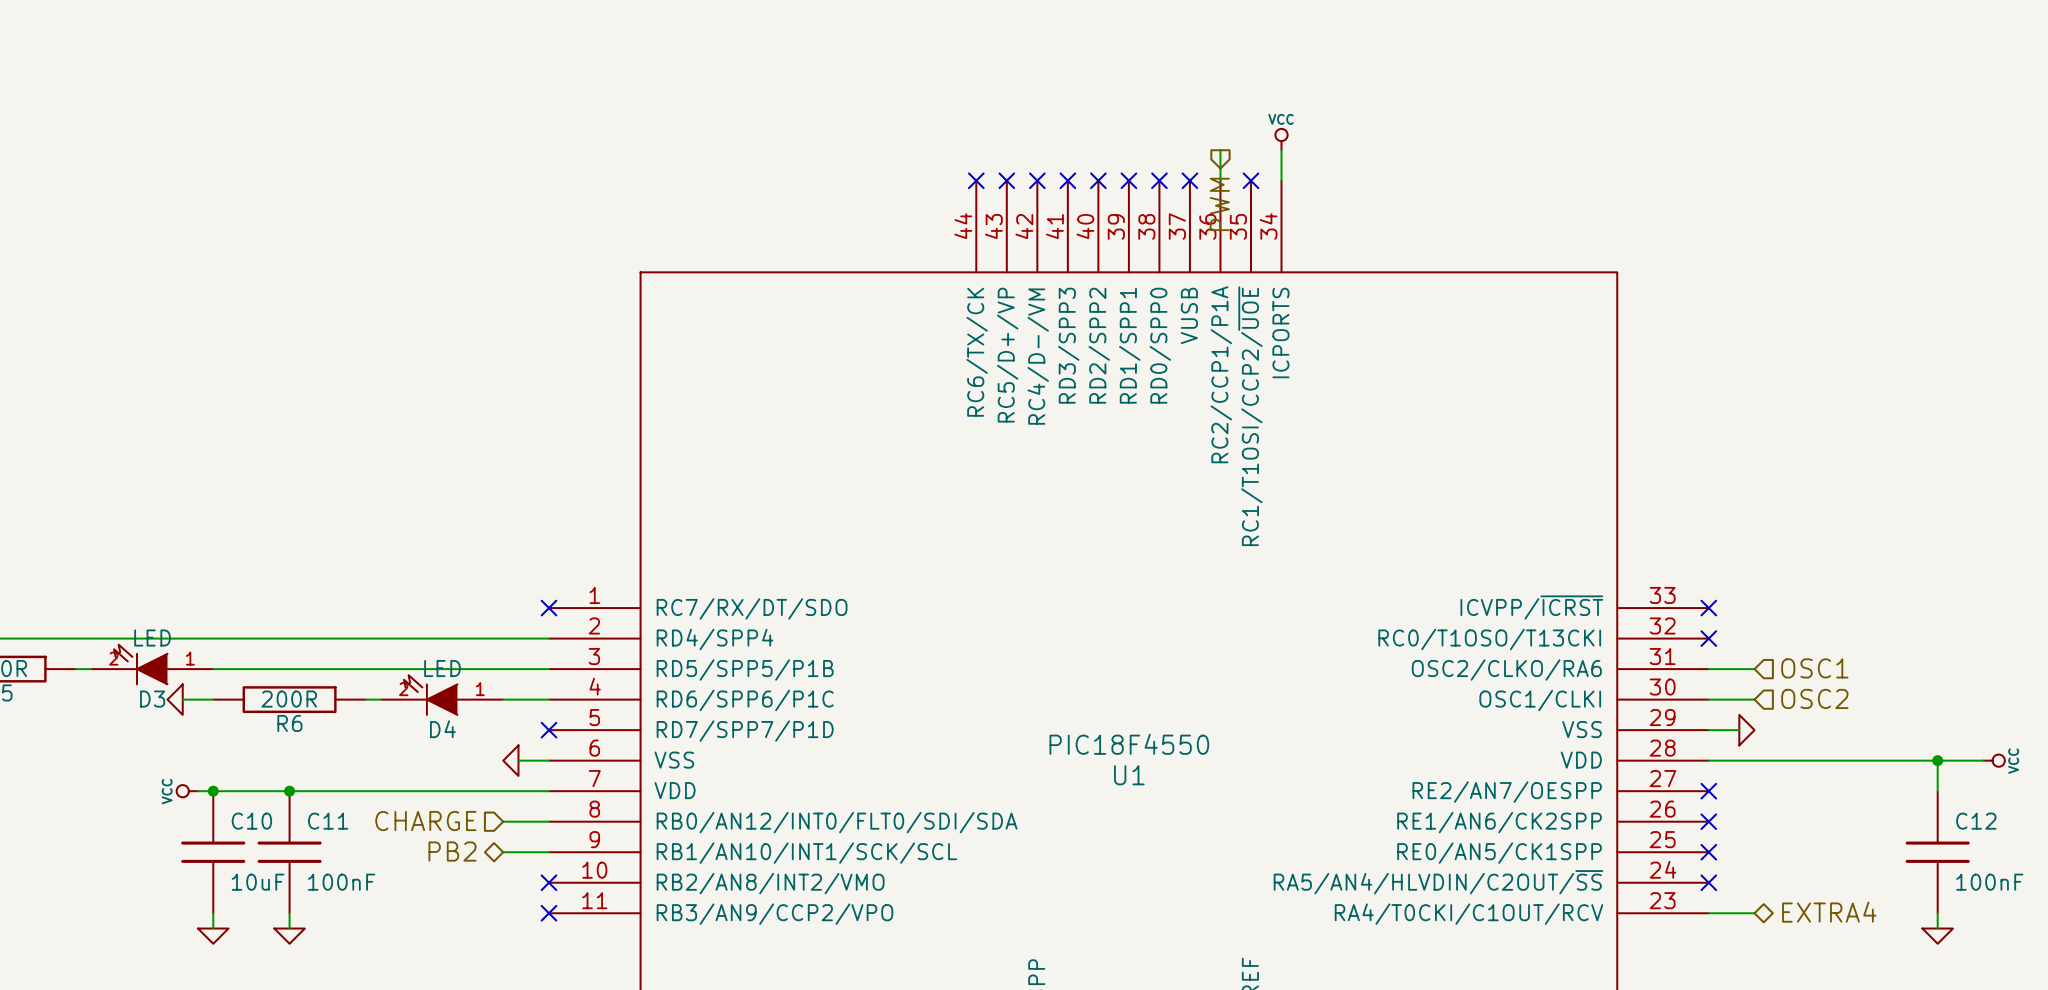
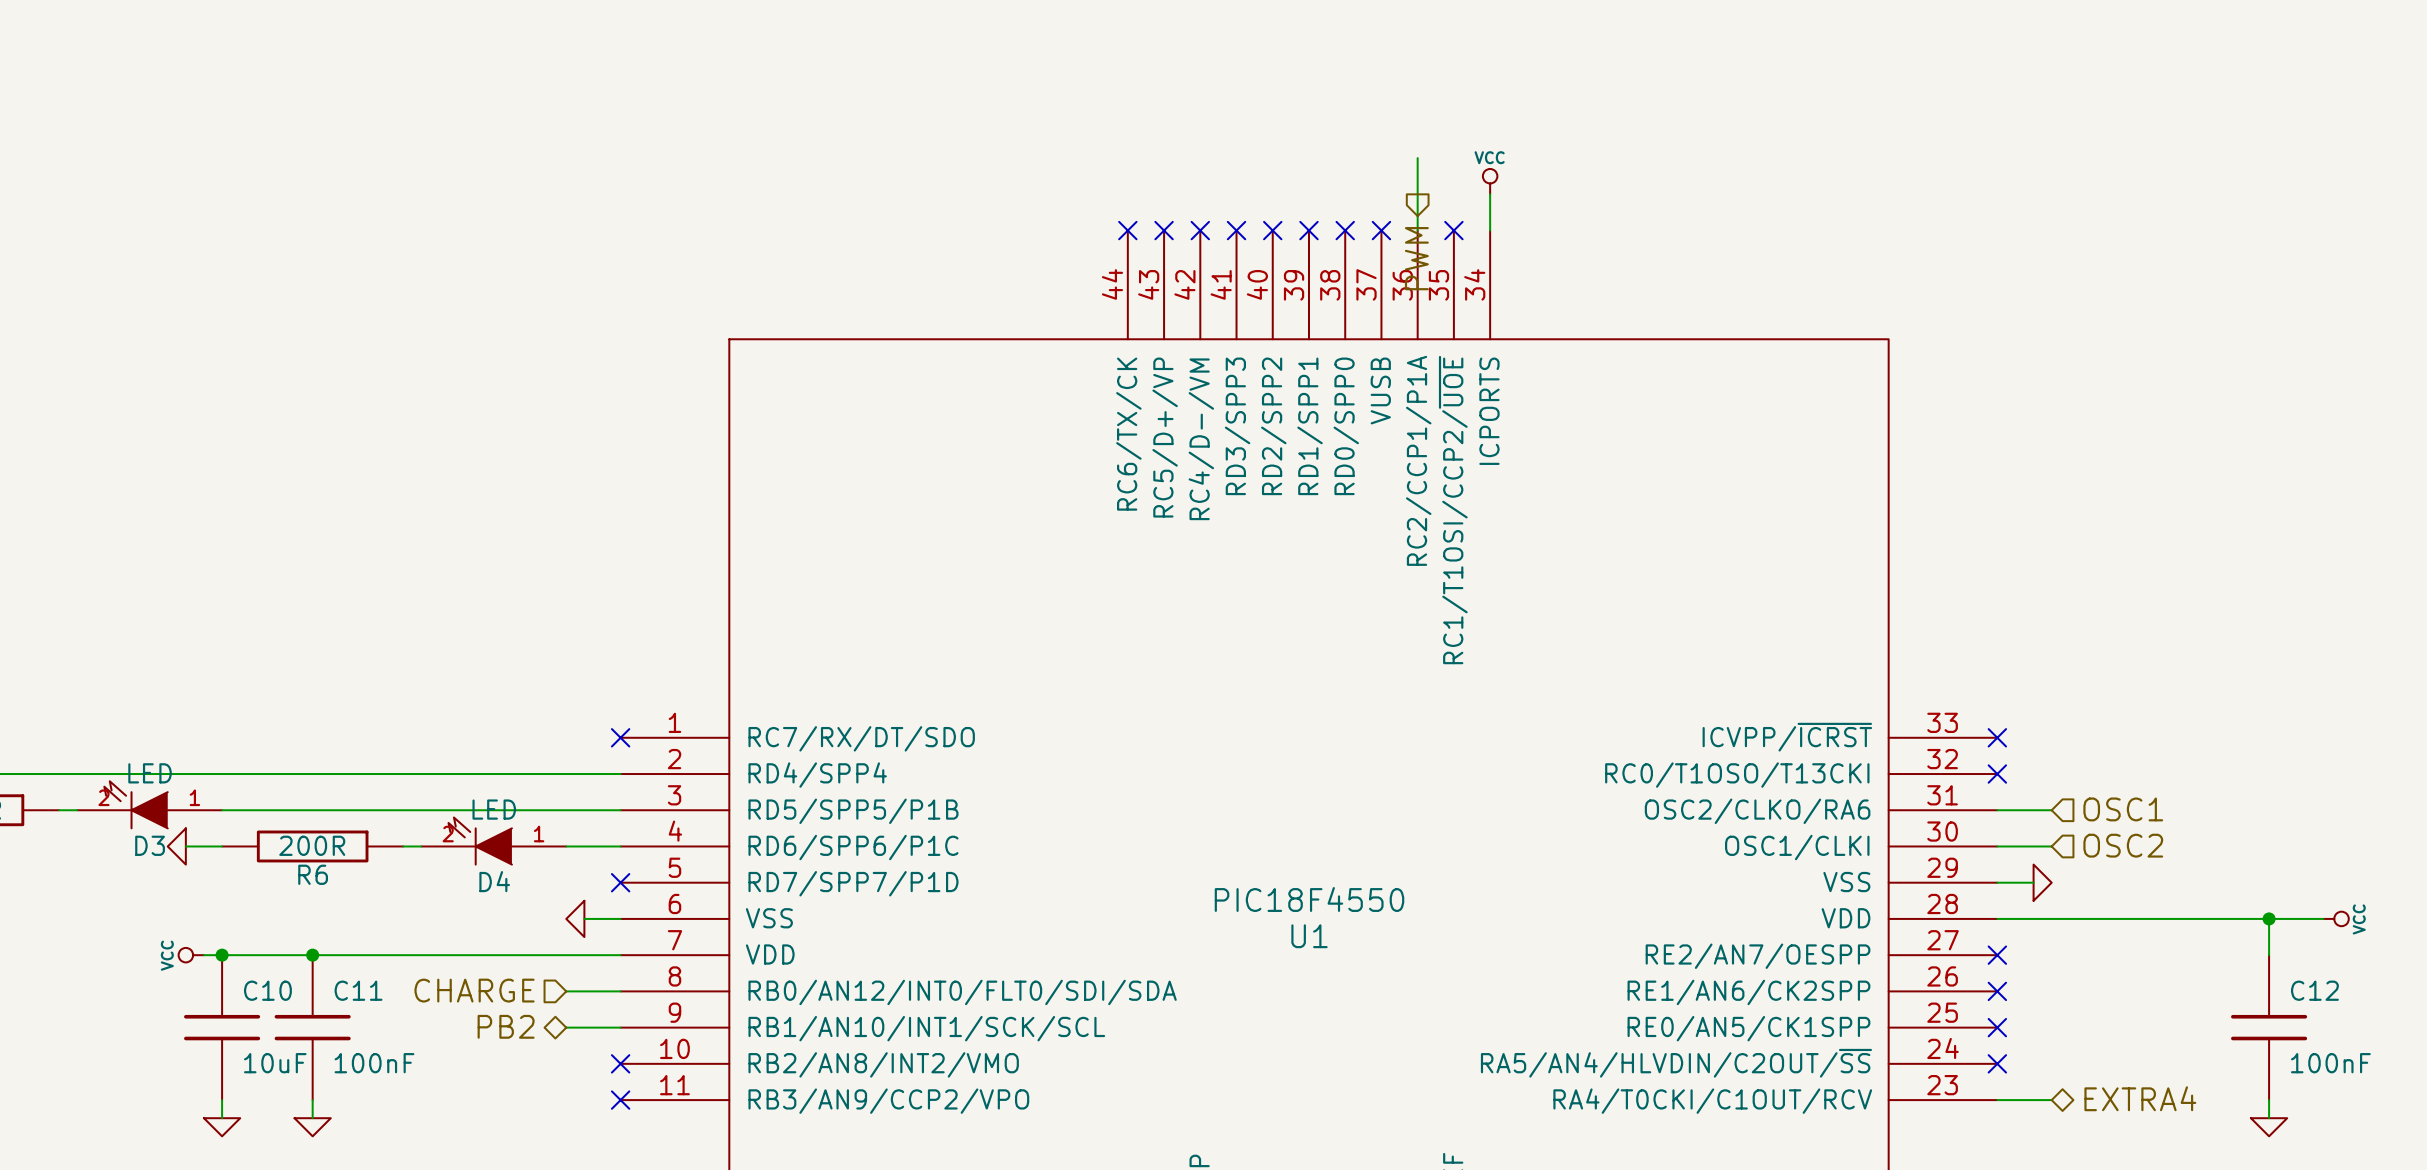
wire: none -> (1417, 158) (1417, 194)

